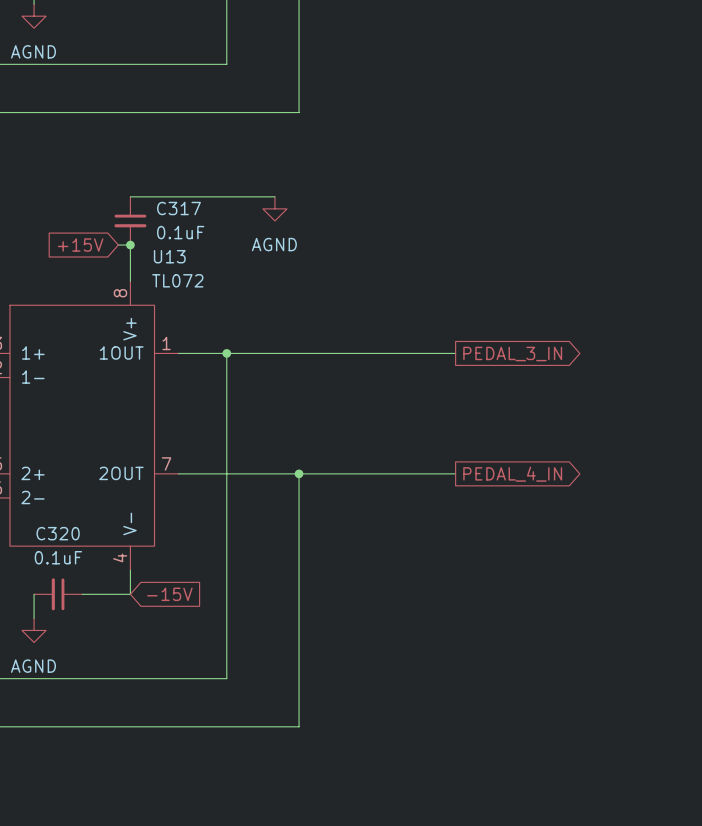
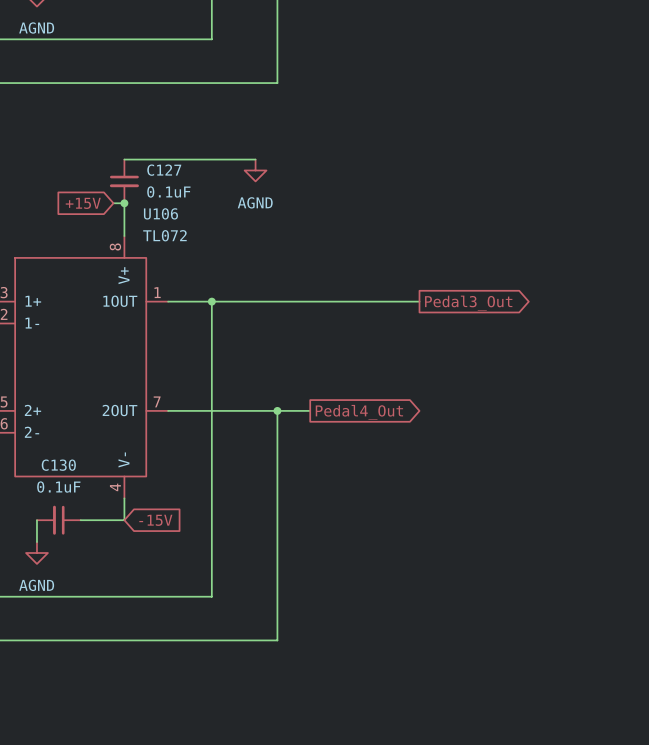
C317 name: C317 (178, 208) -> C127 (164, 170)
U13 name: U13 (169, 256) -> U106 (160, 213)
global label: PEDAL_3_IN (512, 354) -> Pedal3_Out (468, 303)
wire: (335, 473) (455, 473) -> none
global label: none -> Pedal4_Out (359, 412)
global label: PEDAL_4_IN (512, 474) -> none
C320 name: C320 (58, 533) -> C130 (58, 465)

